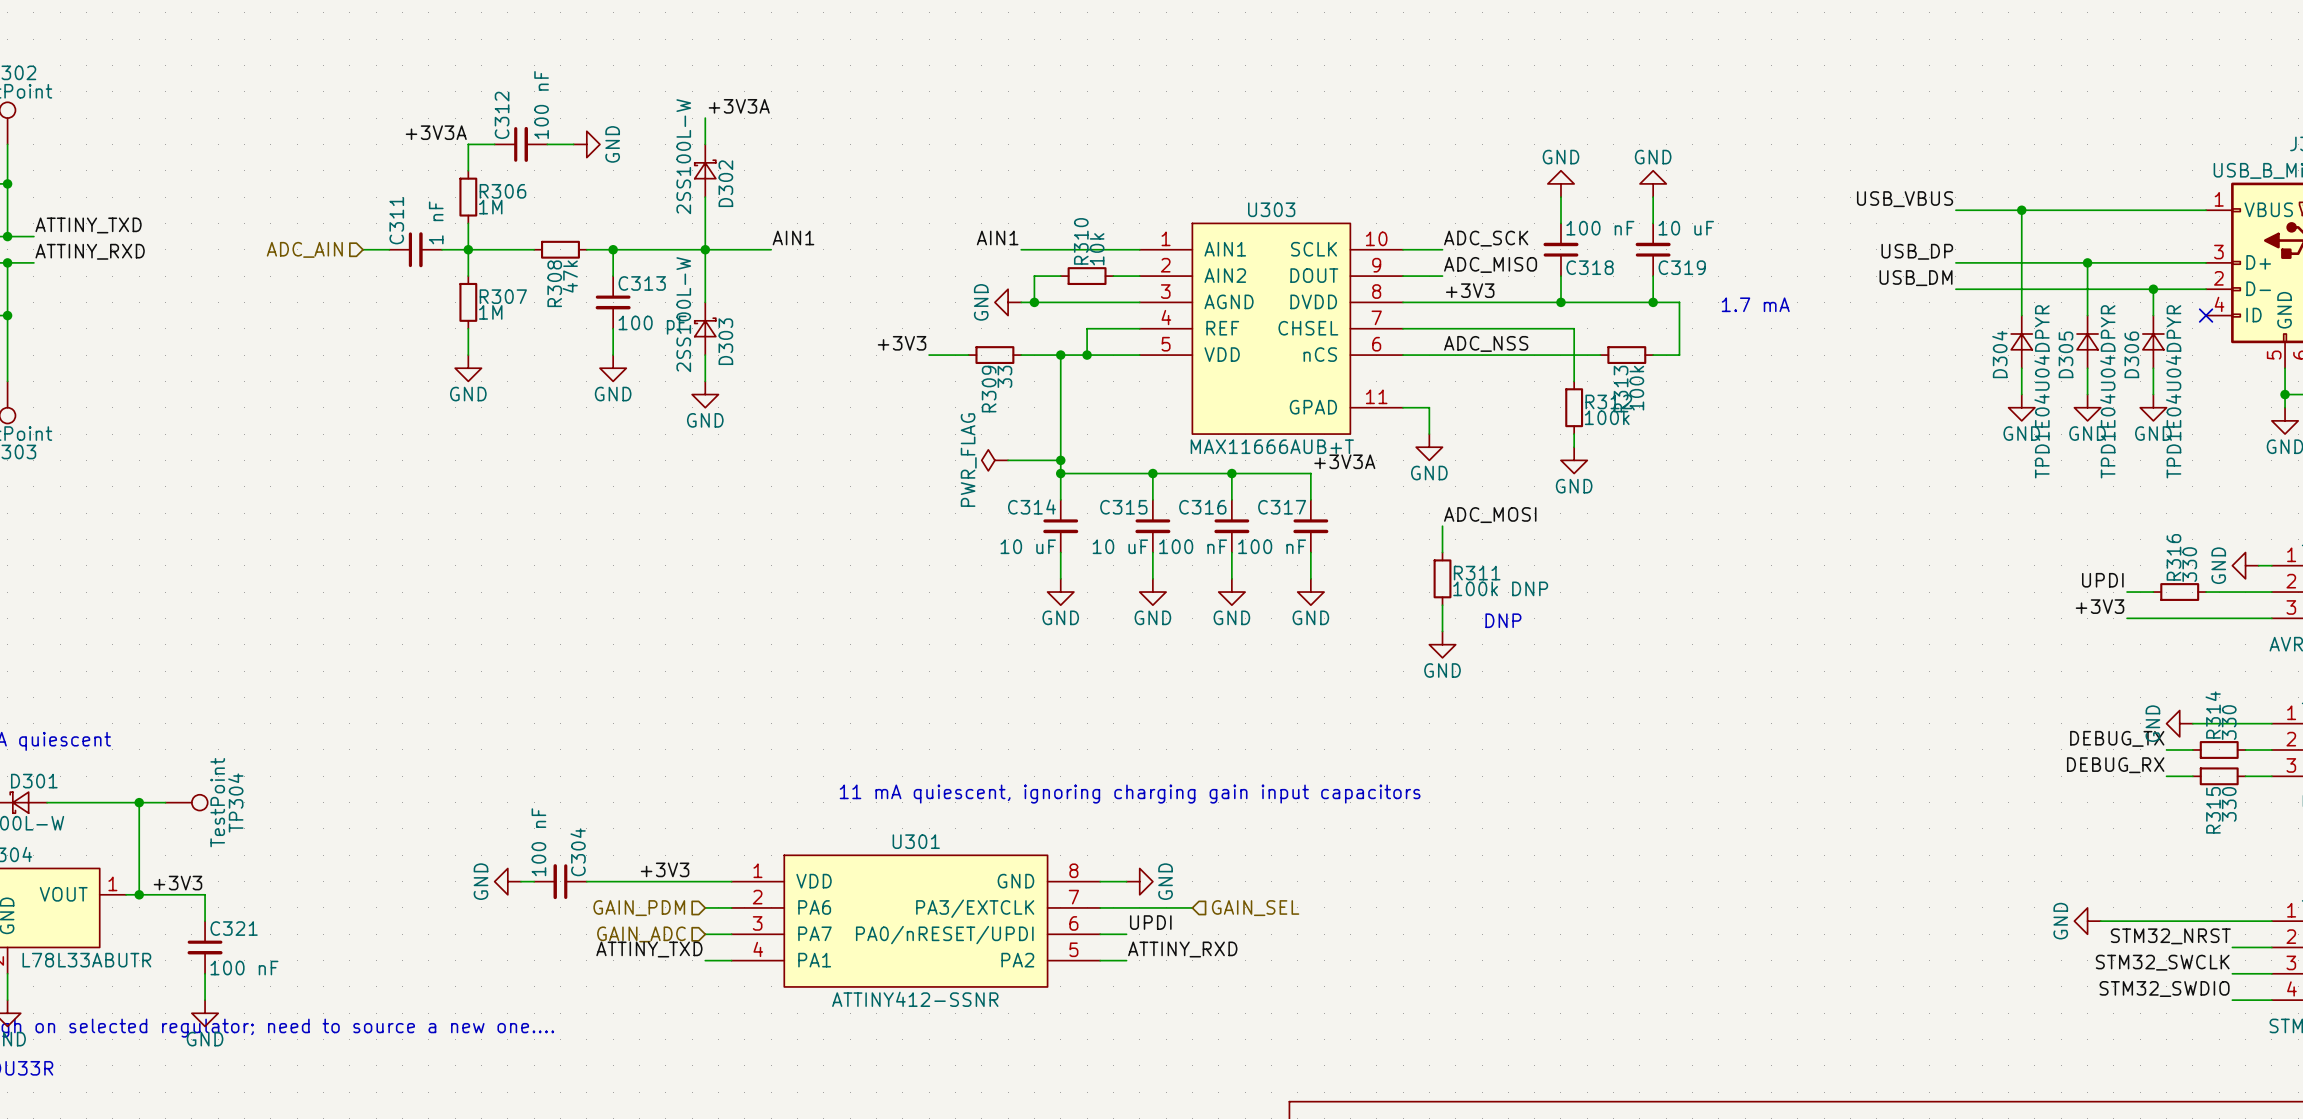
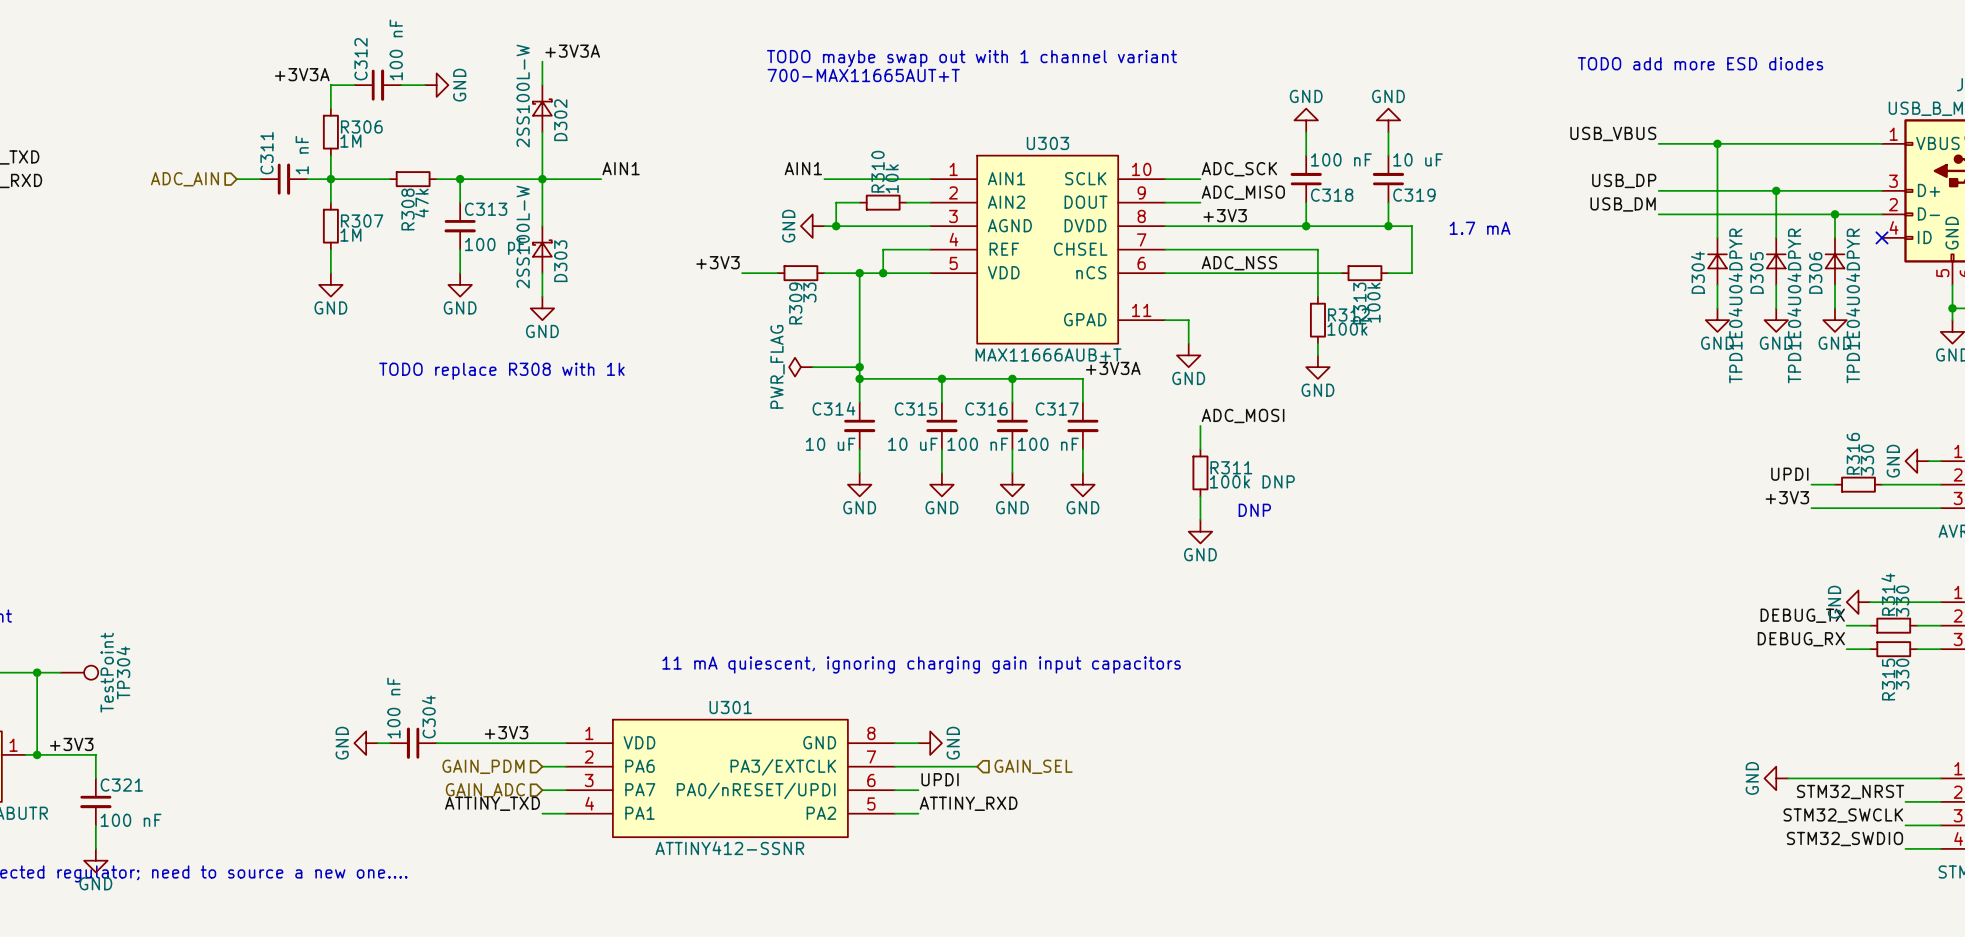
text: none -> TODO maybe swap out with 1 channel variant (971, 58)
text: none -> TODO add more ESD diodes (1700, 63)
text: none -> 700-MAX11665AUT+T (863, 75)
text: none -> TODO replace R308 with 1k (501, 371)

